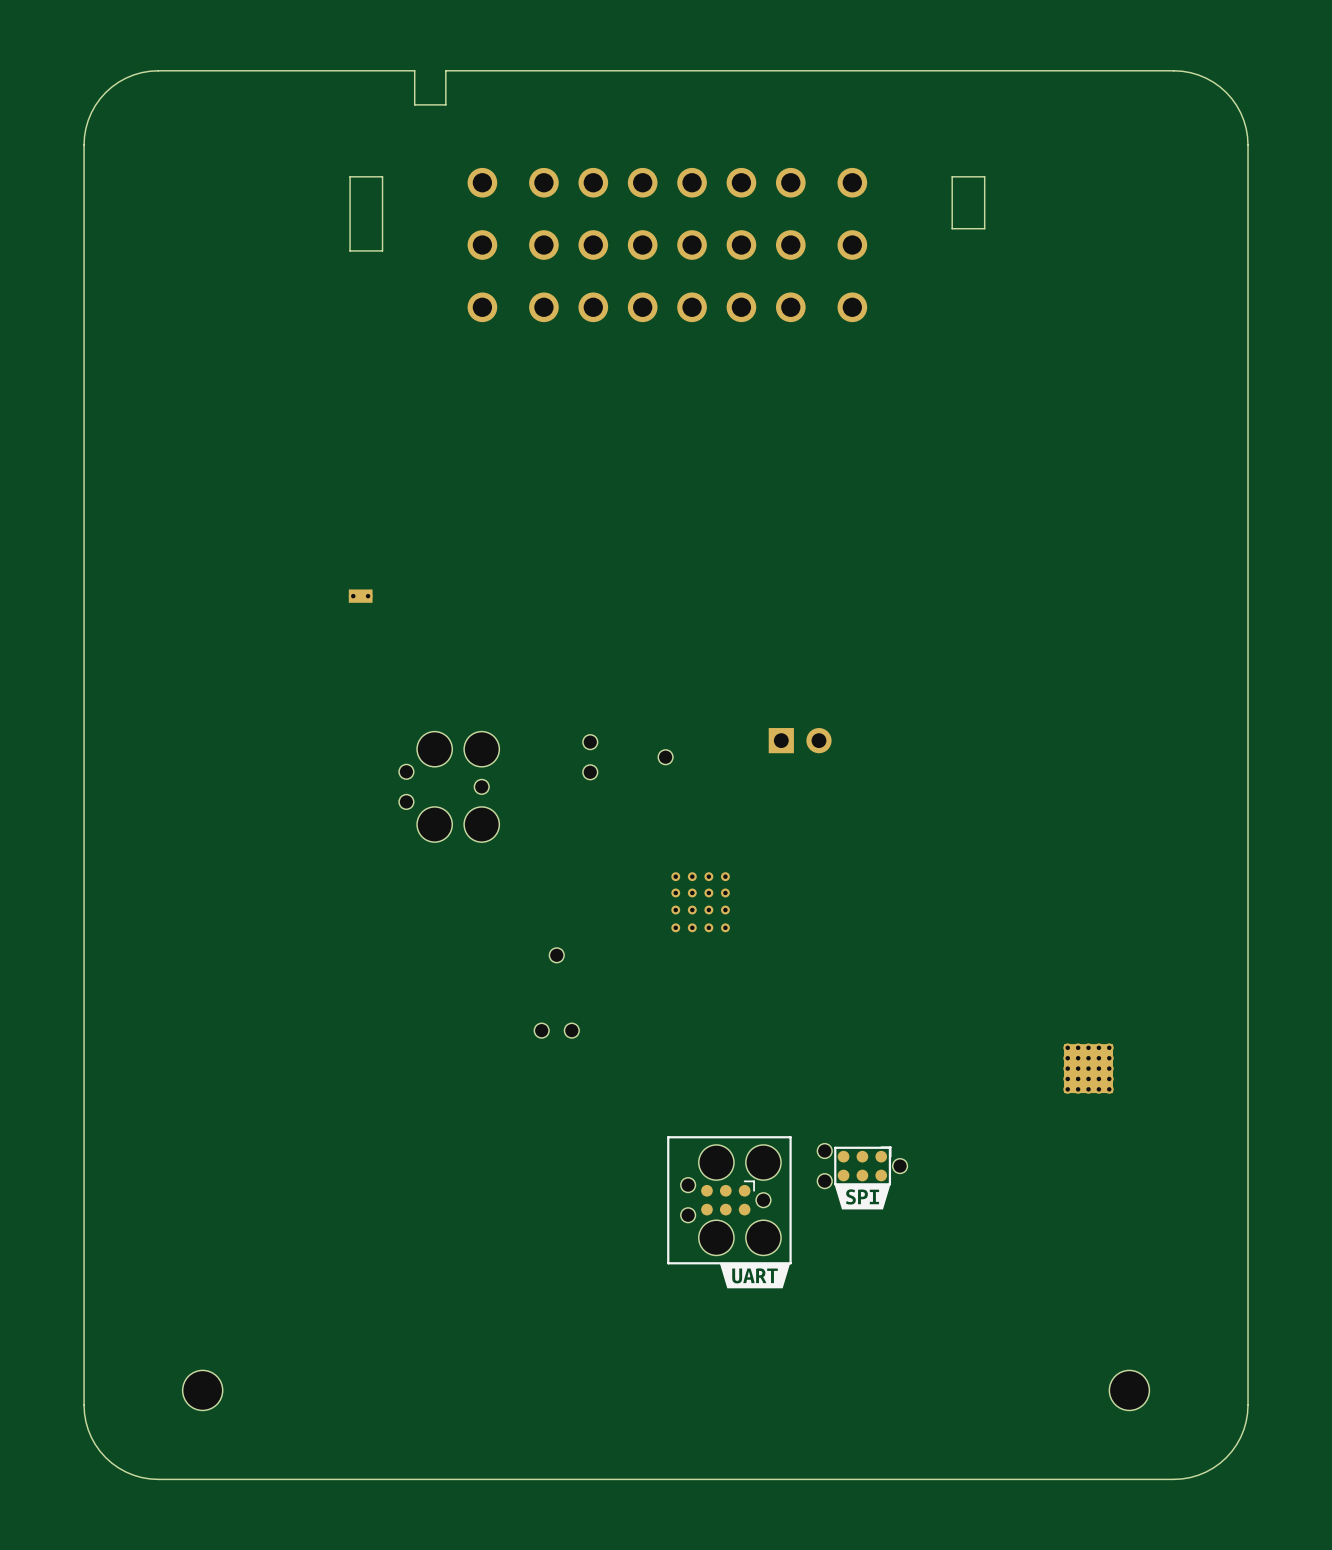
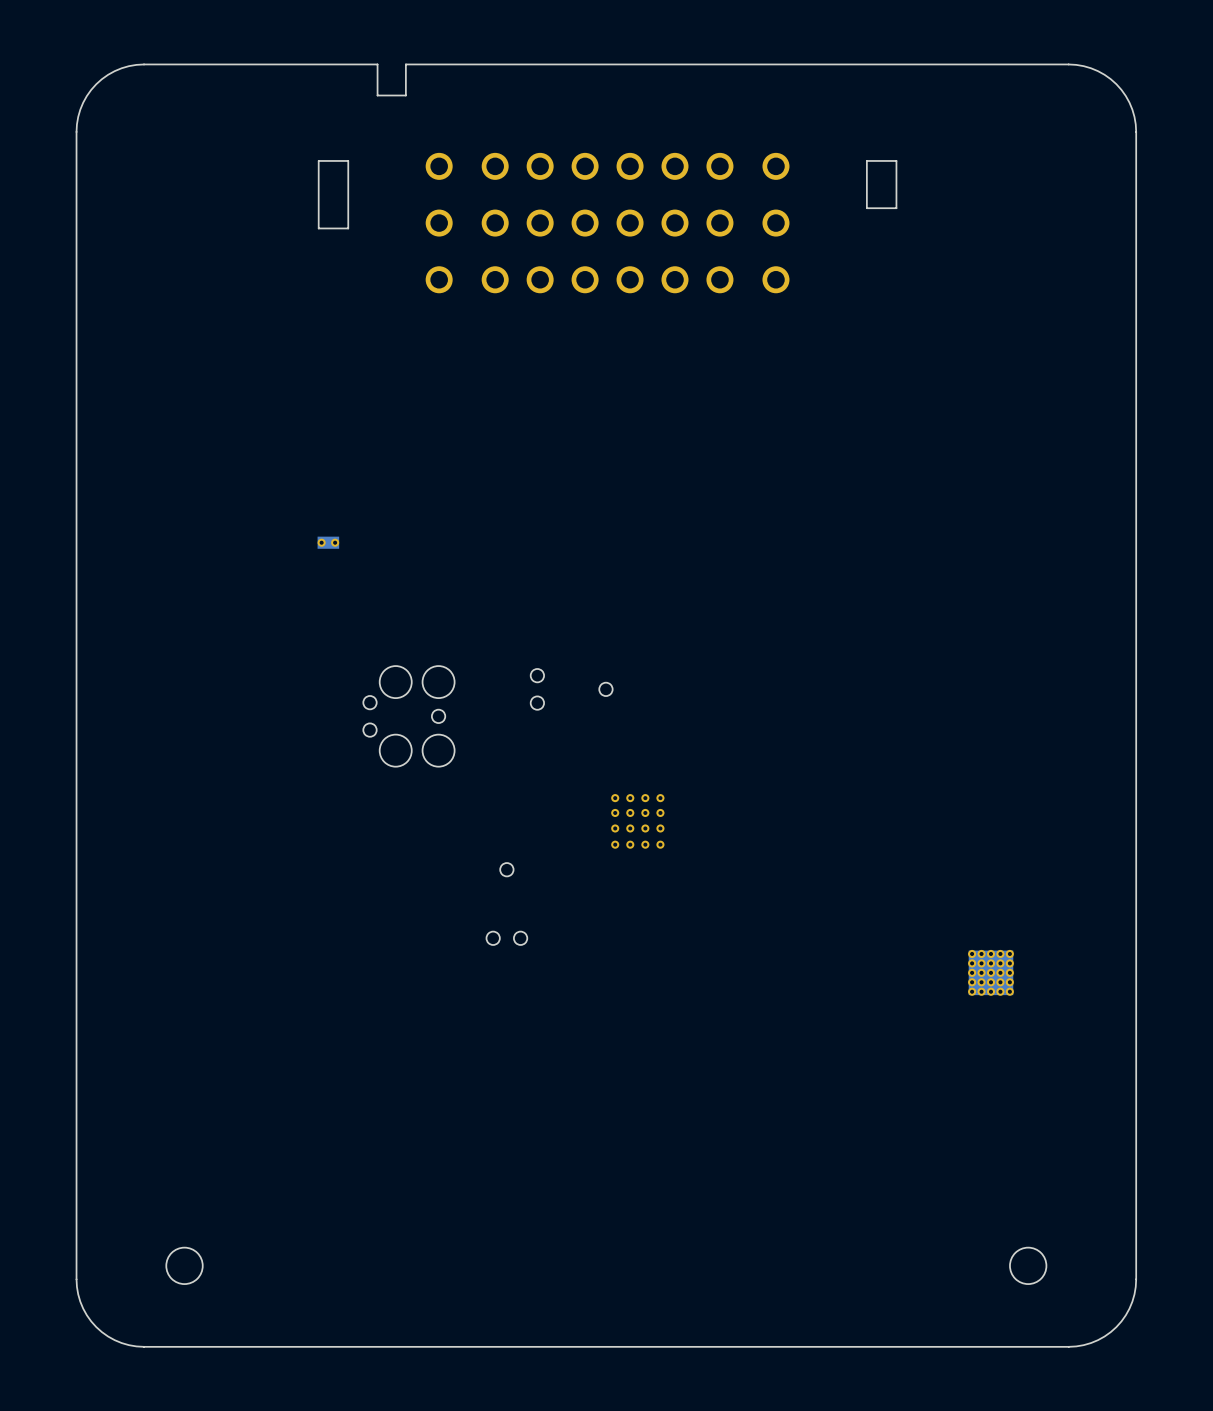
part: (800, 740) -> none
line: (790, 1137) (668, 1137) (668, 1263) (790, 1263) (790, 1137) -> none
line: (889, 1147) (835, 1147) (835, 1184) (889, 1184) (889, 1147) -> none
part: (862, 1166) -> none
drawing: [834, 1184, 891, 1210] -> none
part: (730, 1200) -> none
drawing: [719, 1263, 791, 1289] -> none

